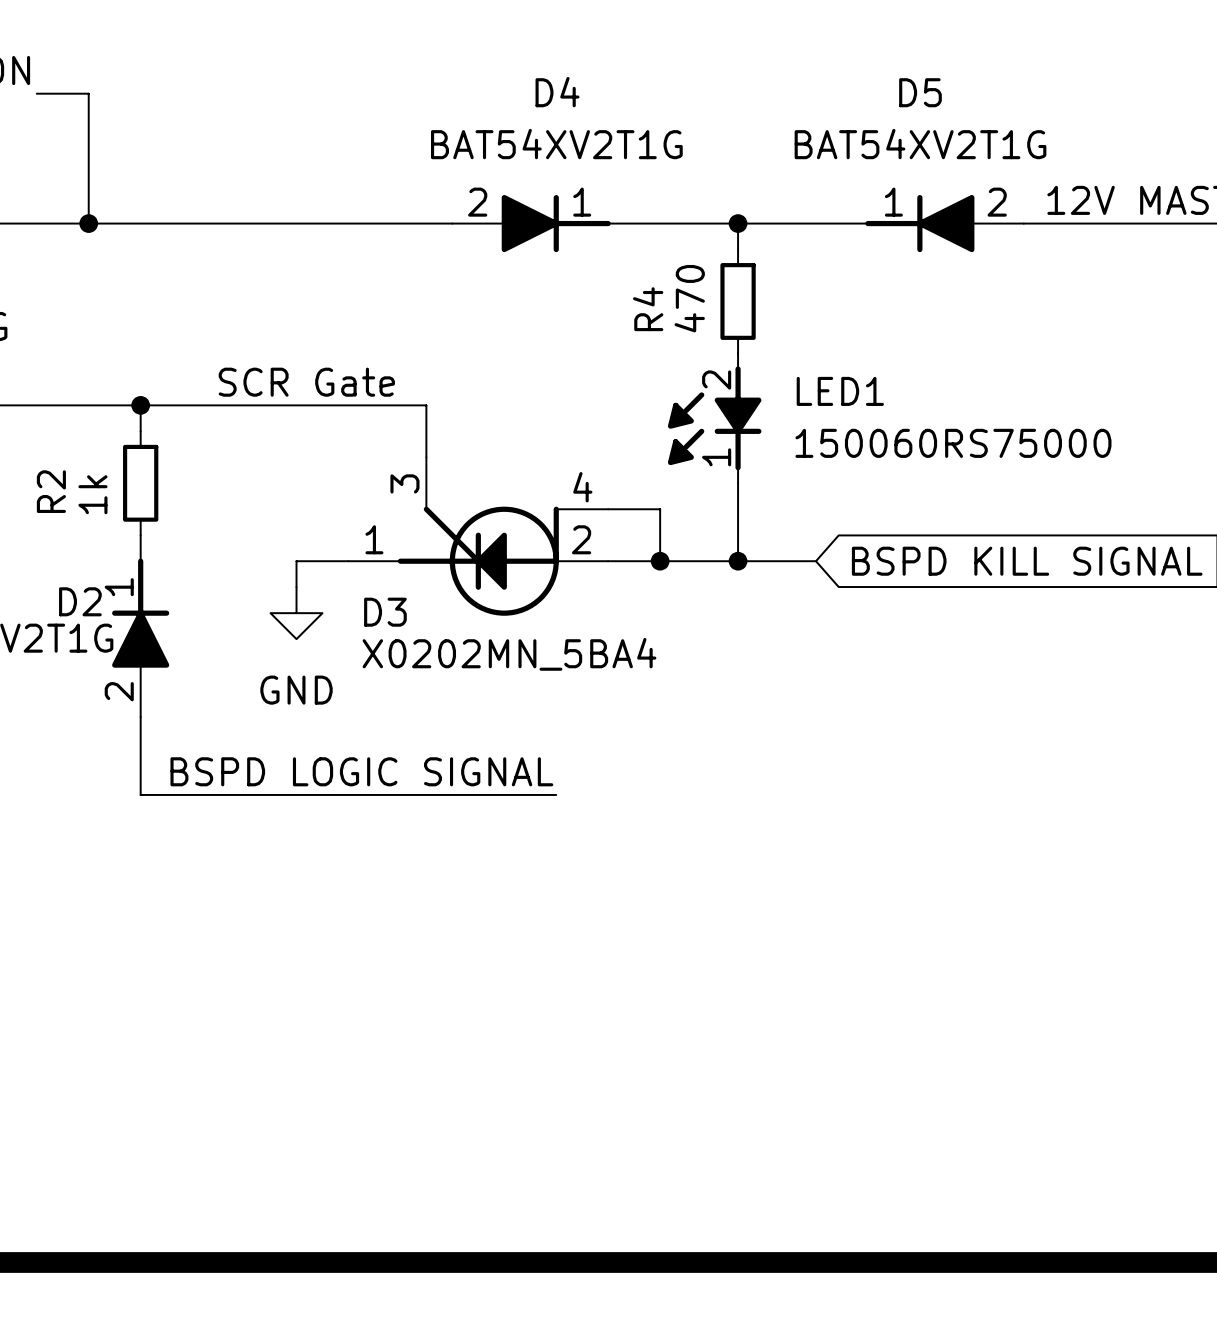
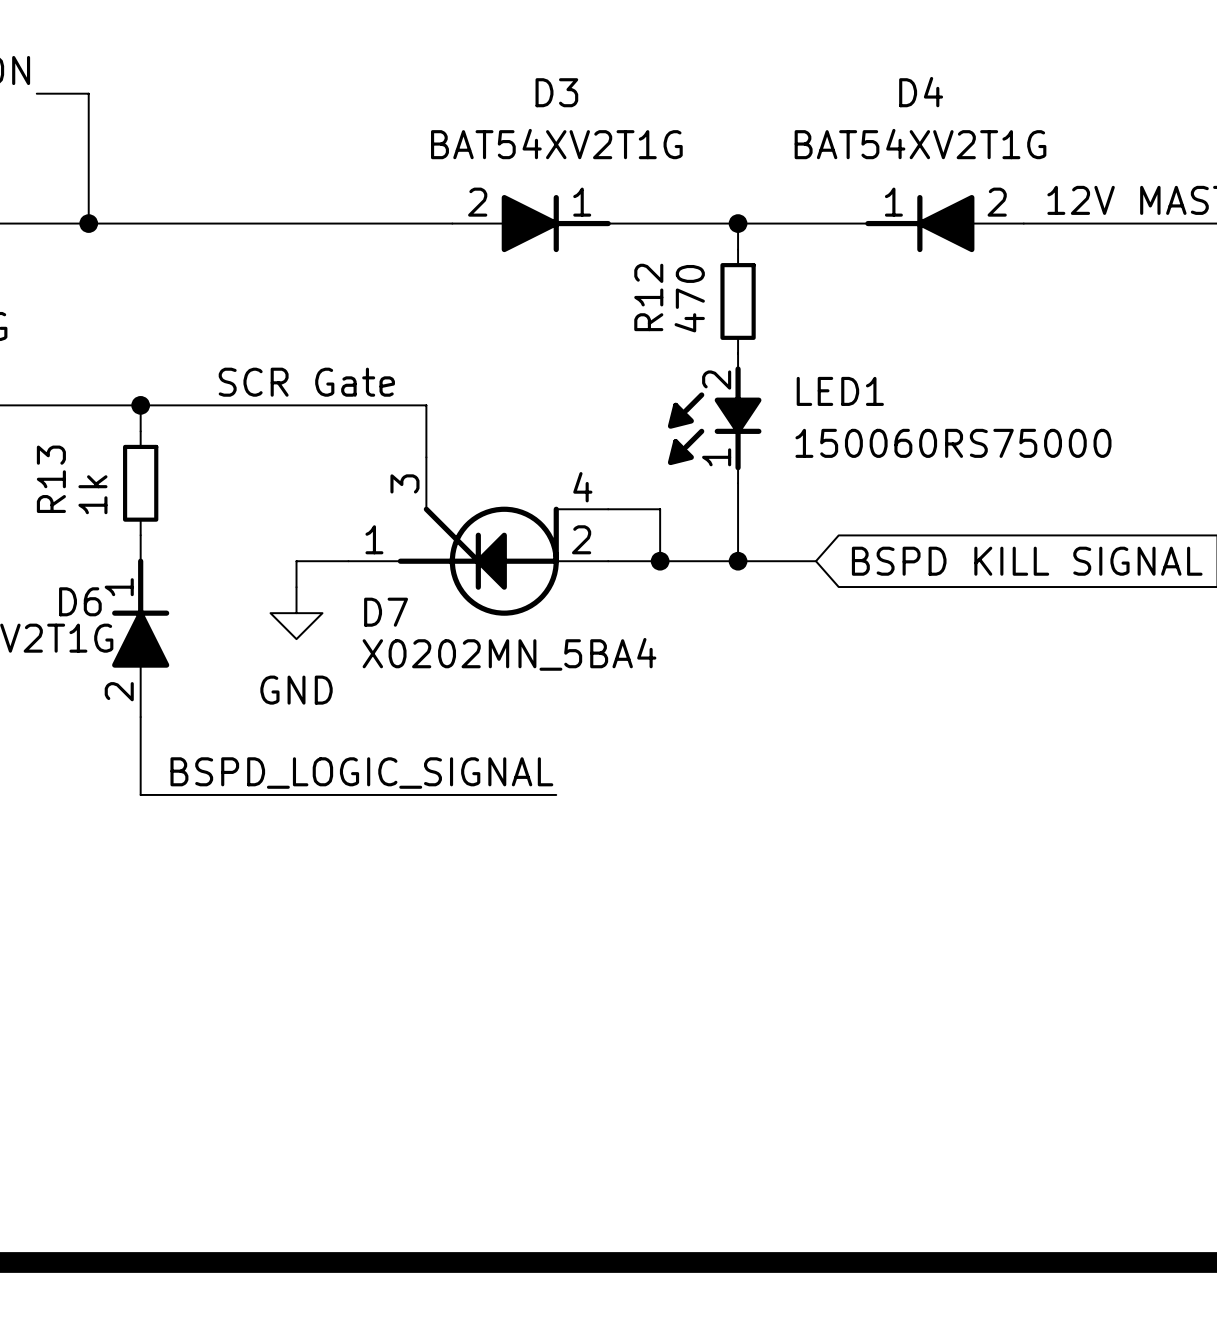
D4 name: D4 (557, 92) -> D3 (556, 92)
D5 name: D5 (920, 92) -> D4 (921, 92)
R4 name: R4 (648, 309) -> R12 (648, 297)
R2 name: R2 (51, 491) -> R13 (51, 479)
D2 name: D2 (80, 601) -> D6 (80, 601)
D3 name: D3 (385, 612) -> D7 (386, 612)
label: BSPD LOGIC SIGNAL (361, 771) -> BSPD_LOGIC_SIGNAL (361, 773)

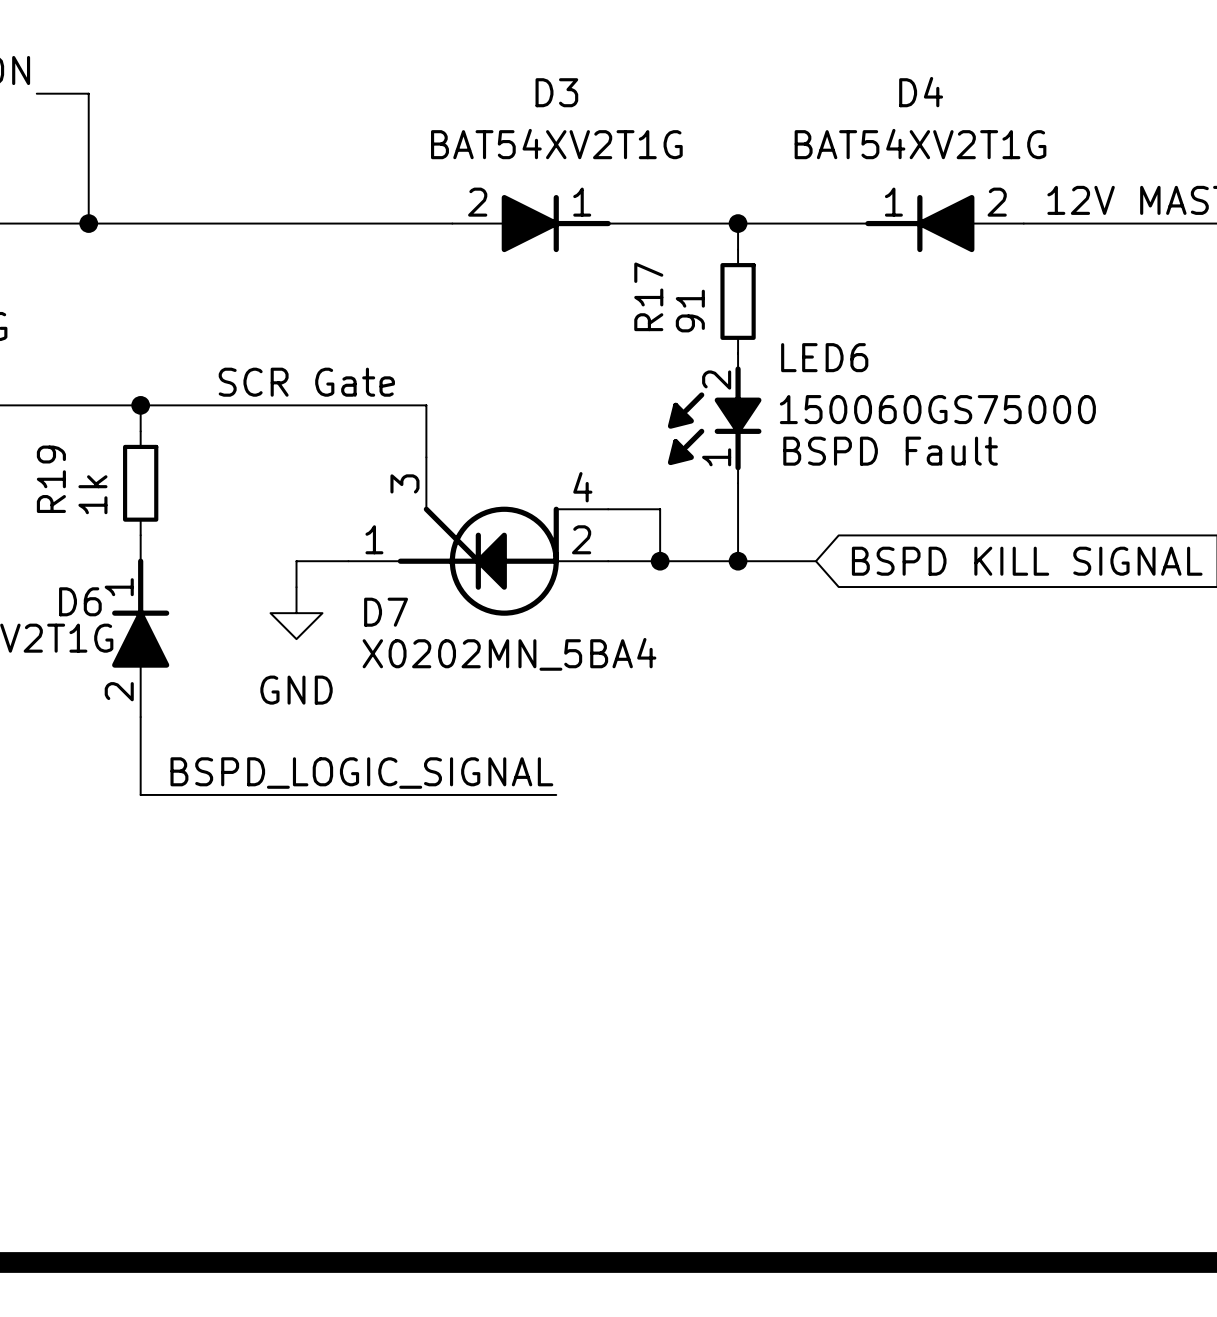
R12 name: R12 (648, 297) -> R17 (648, 296)
R12 value: 470 (689, 298) -> 91 (690, 311)
LED1 name: LED1 (840, 391) -> LED6 (824, 357)
LED1 value: 150060RS75000 (953, 443) -> 150060GS75000 (937, 409)
LED1 text: none -> BSPD Fault (890, 451)
R13 name: R13 (51, 479) -> R19 (51, 479)

